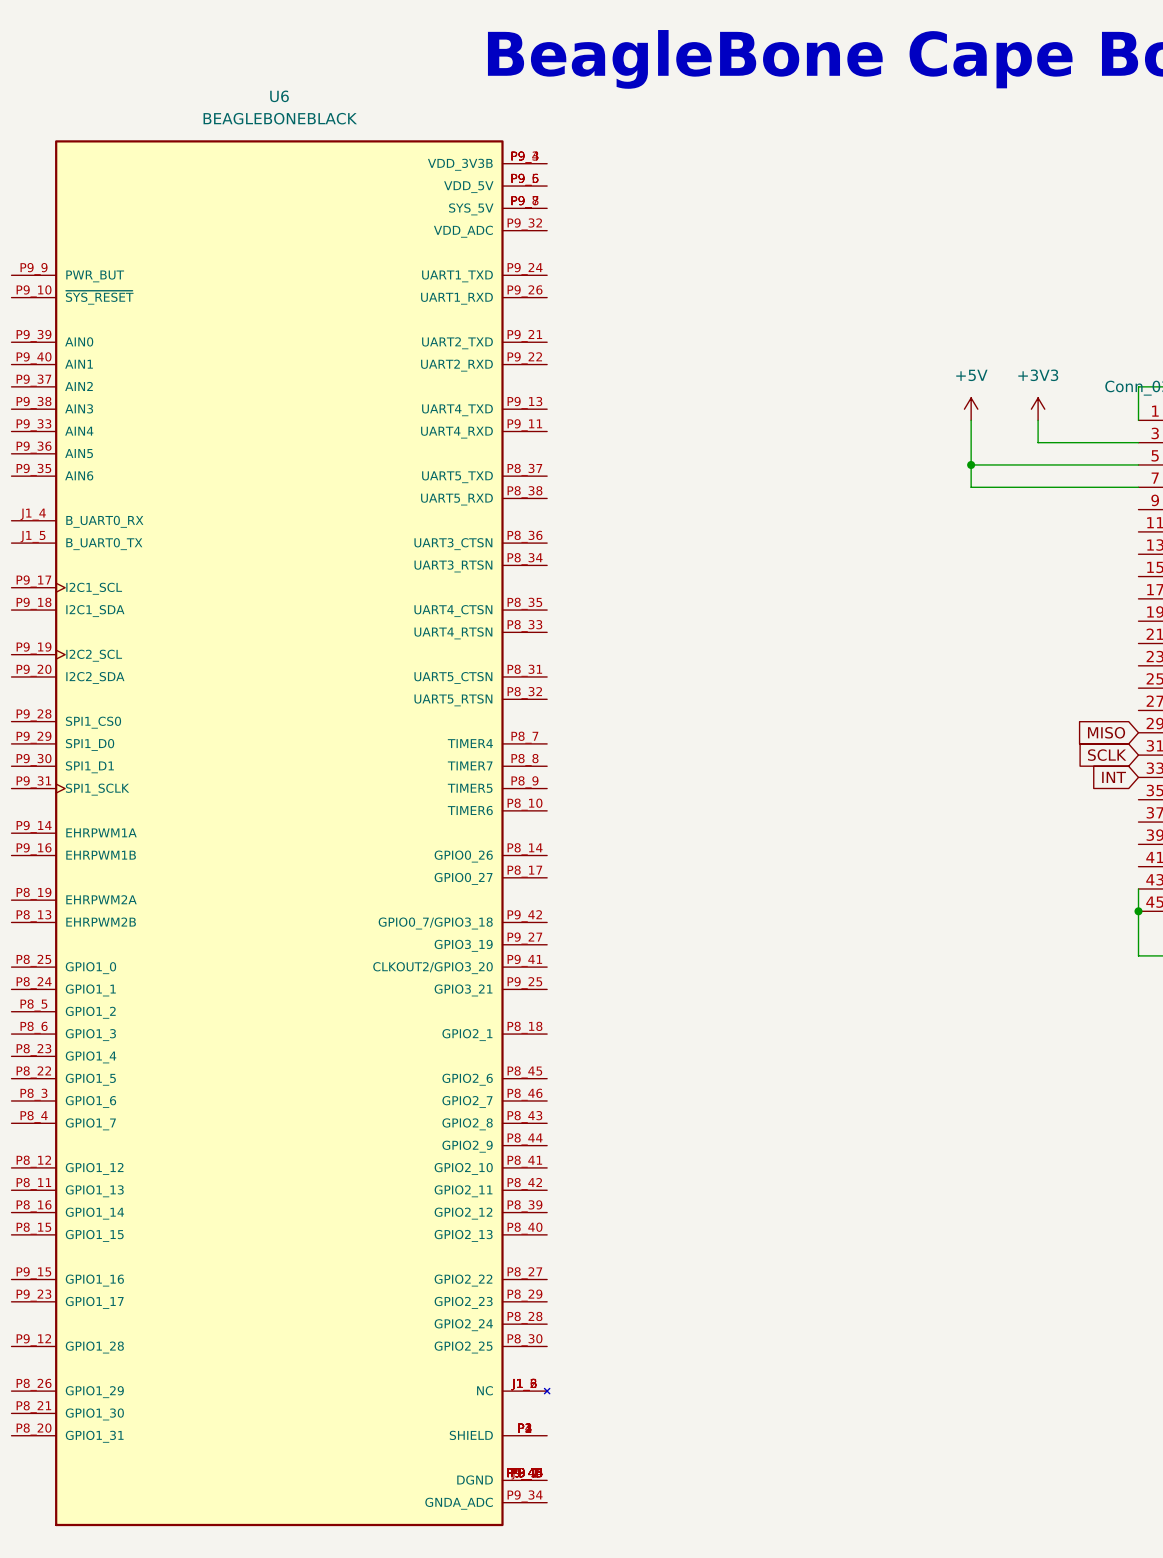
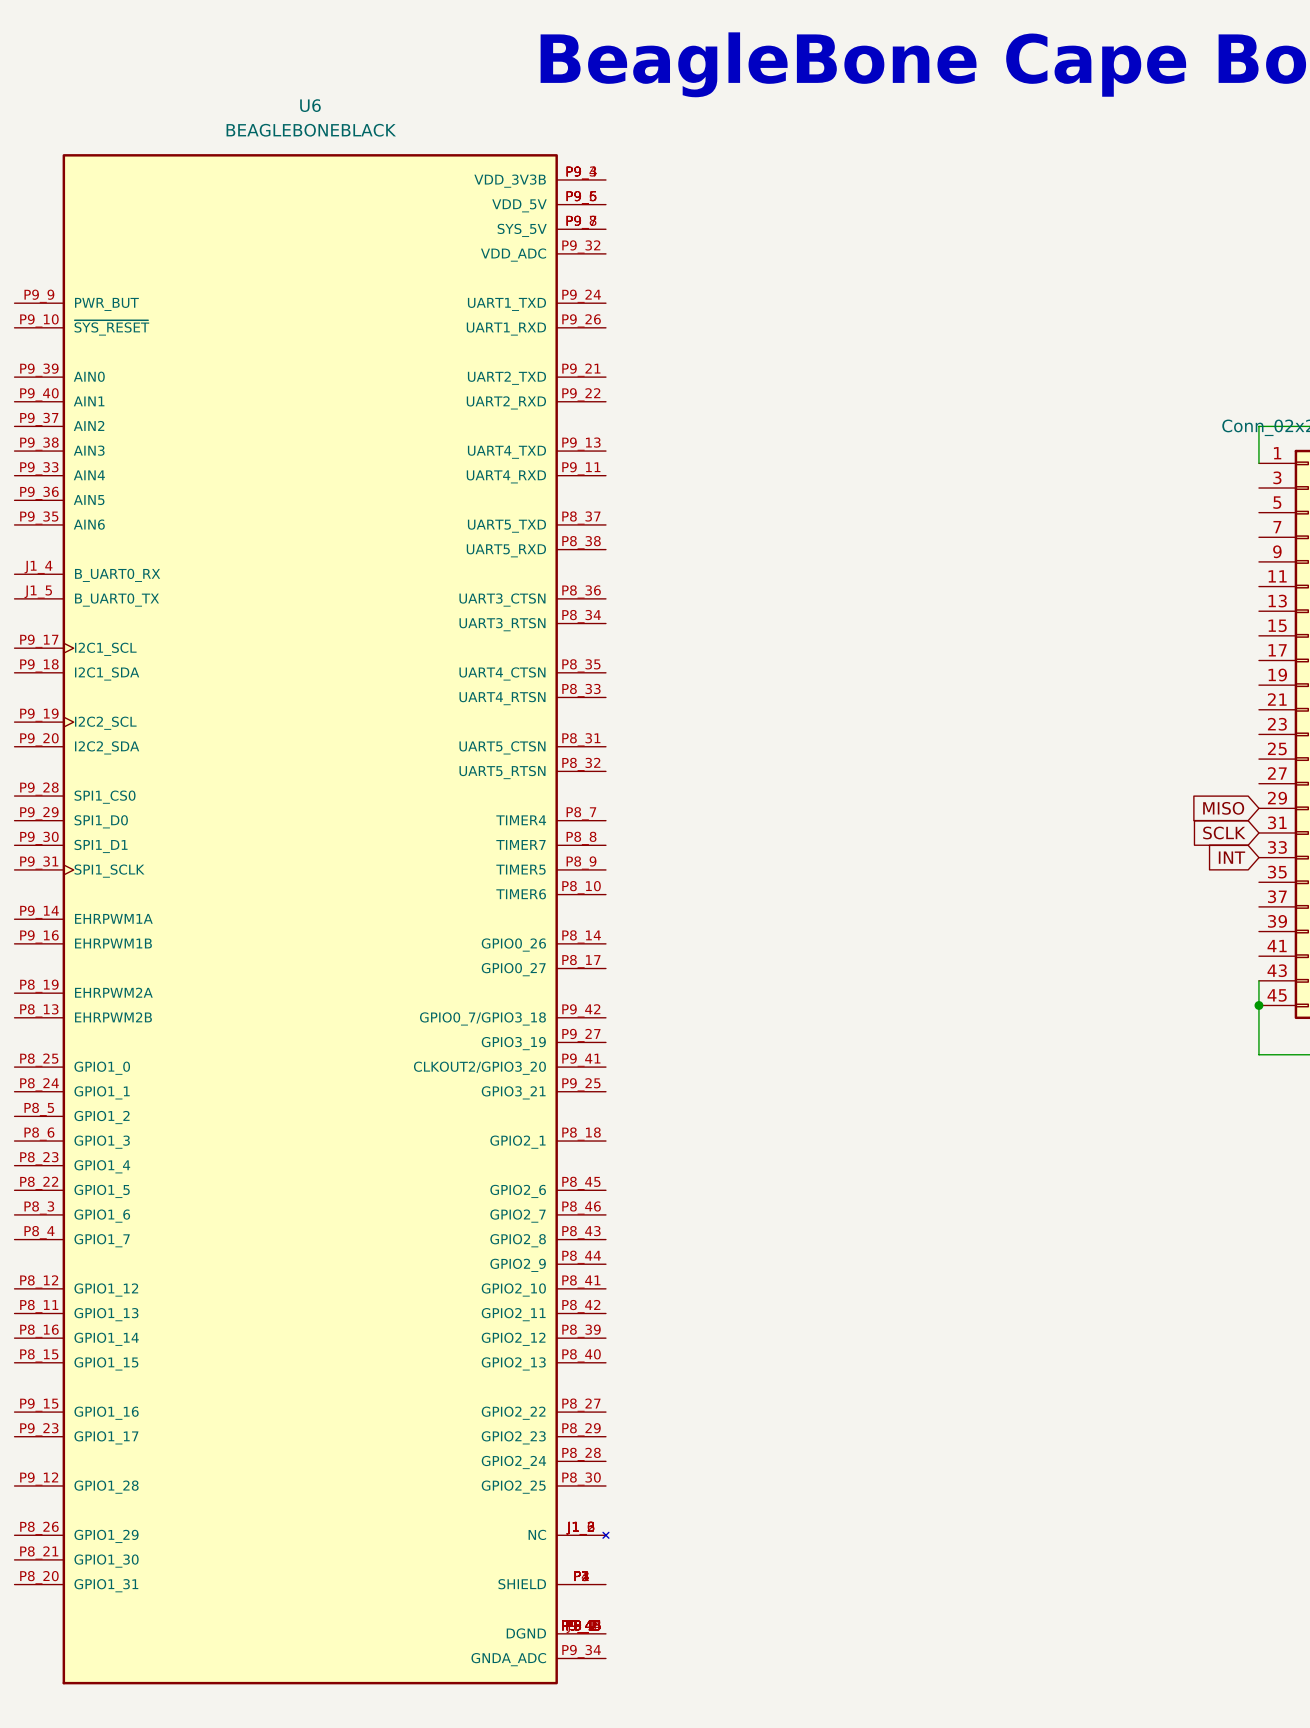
power symbol: +5V (971, 409) -> none
power symbol: +3V3 (1038, 409) -> none
wire: (971, 420) (971, 487) (1138, 487) -> none
wire: (1038, 420) (1038, 442) (1138, 442) -> none
wire: (971, 464) (1138, 464) -> none
junction: (971, 464) -> none

